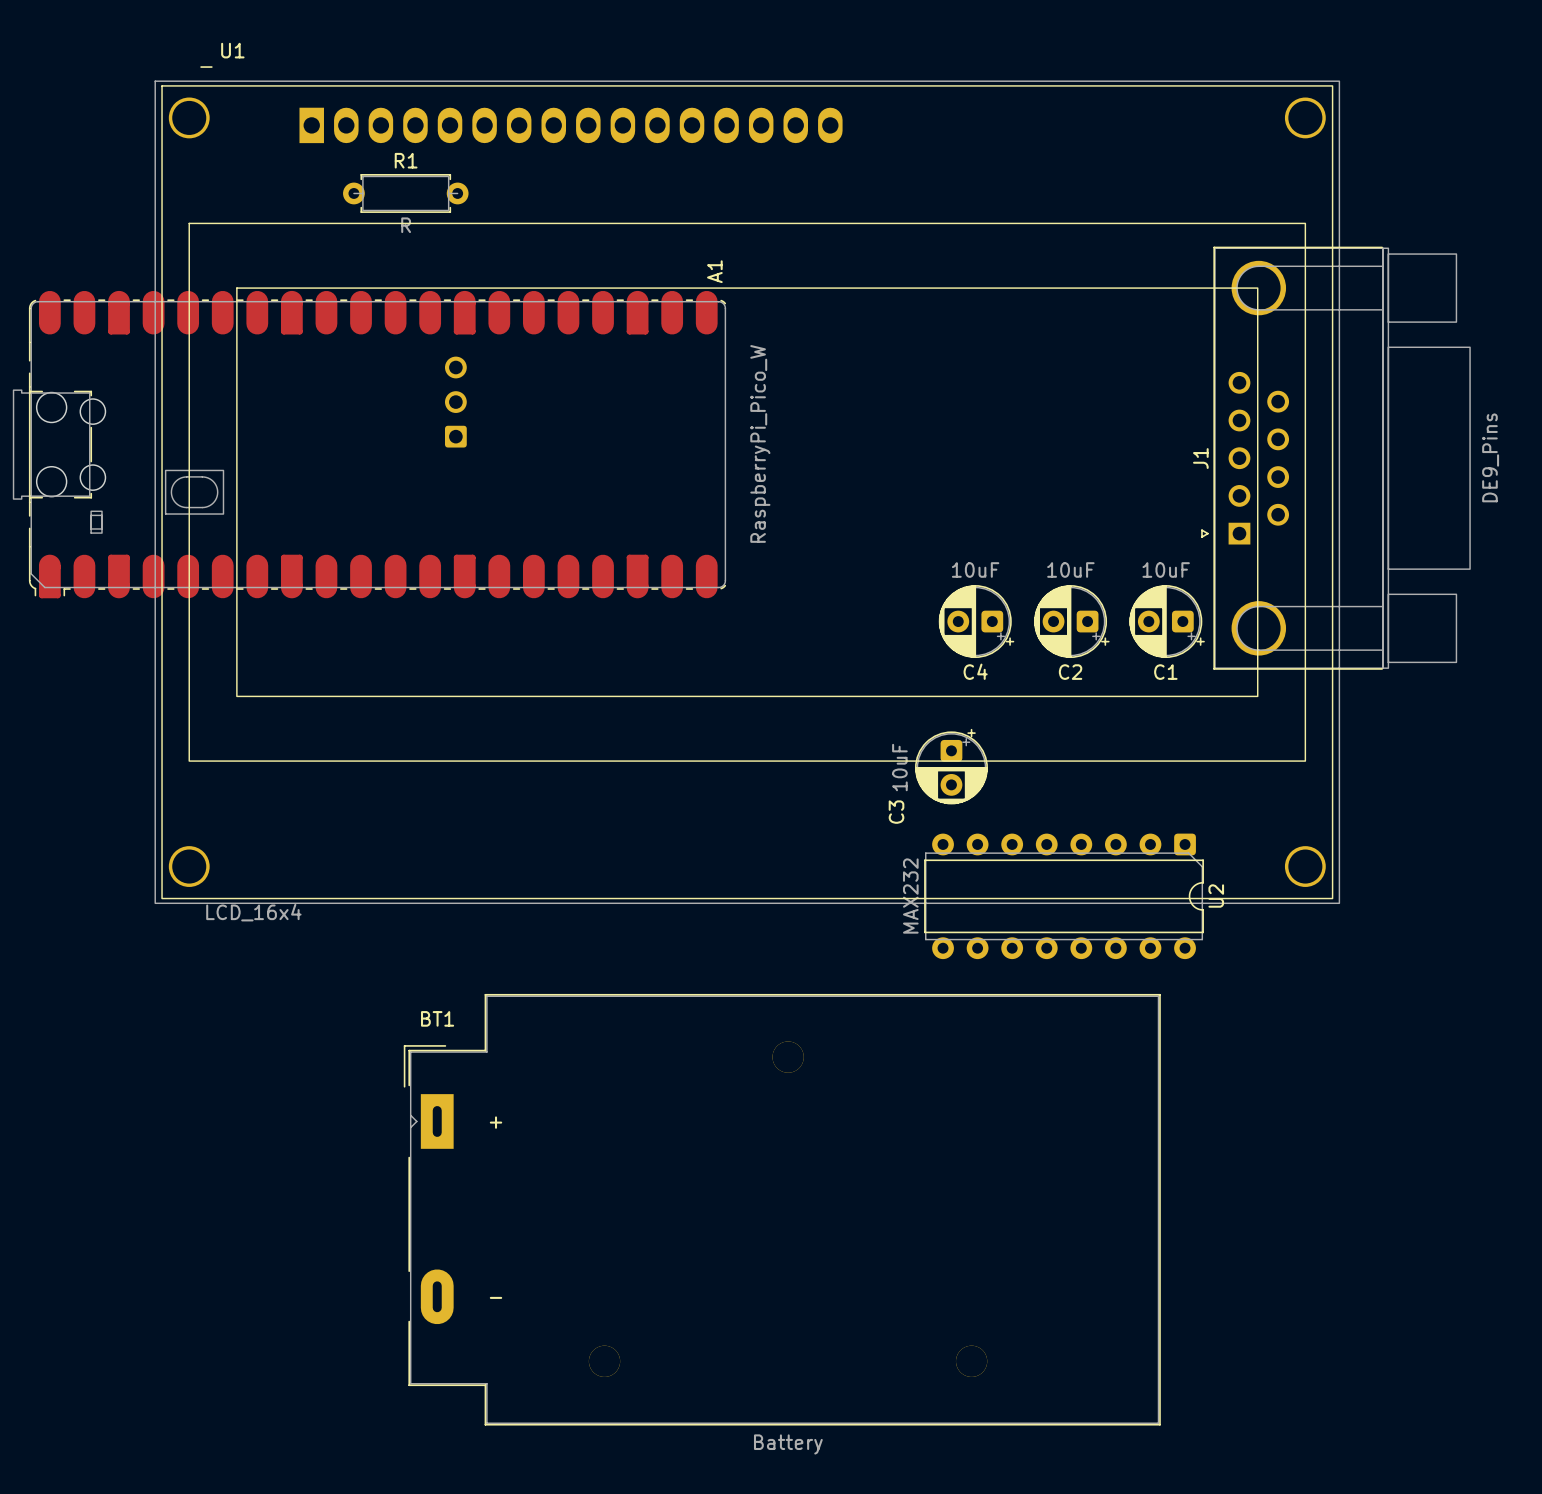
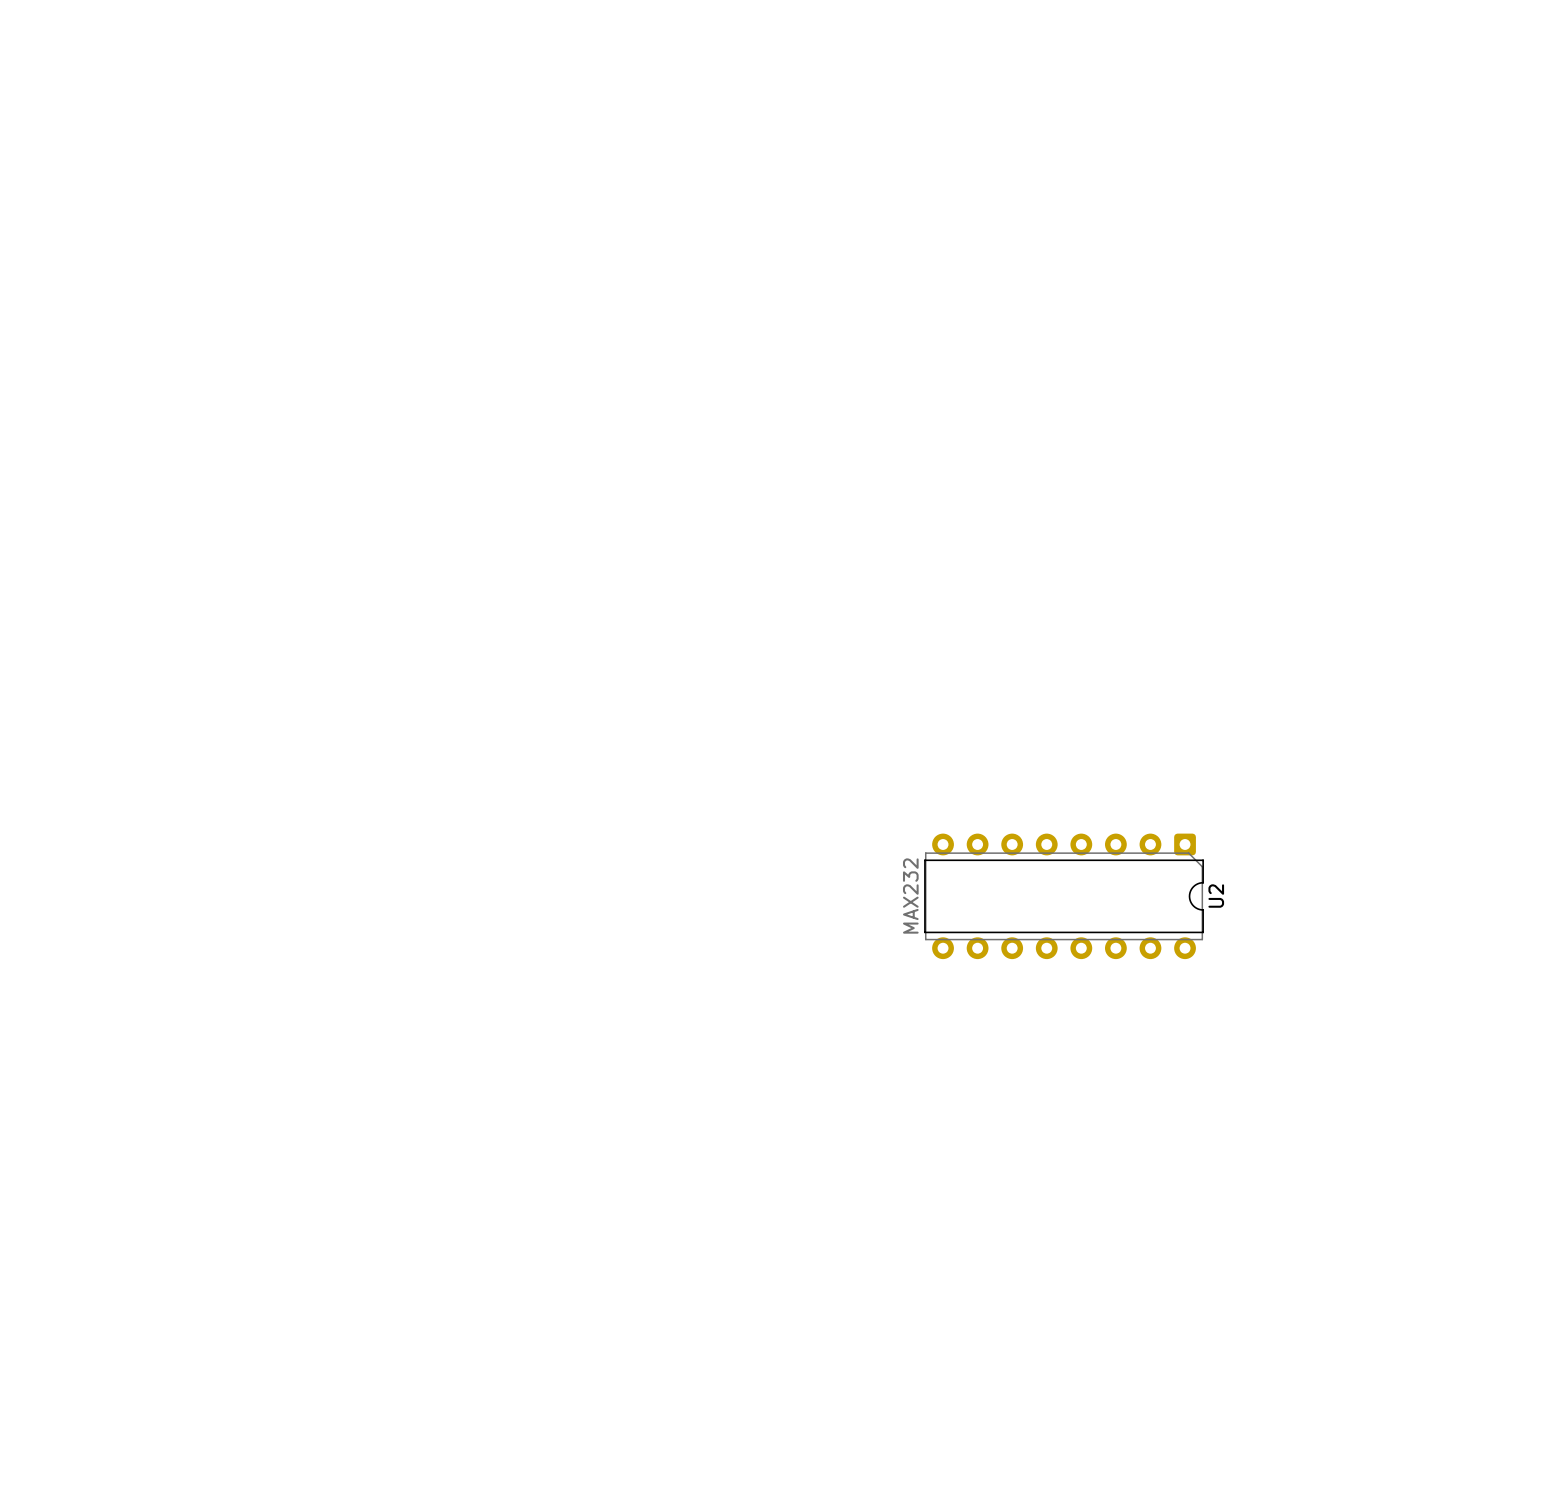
R1: R (405, 193) -> none
A1: RaspberryPi_Pico_W (369, 444) -> none
J1: DE9_Pins (1335, 458) -> none
U1: LCD_16x4 (747, 485) -> none
C4: 10uF (976, 621) -> none
C2: 10uF (1071, 621) -> none
C1: 10uF (1167, 621) -> none
C3: 10uF (951, 766) -> none
BT1: Battery (782, 1209) -> none

